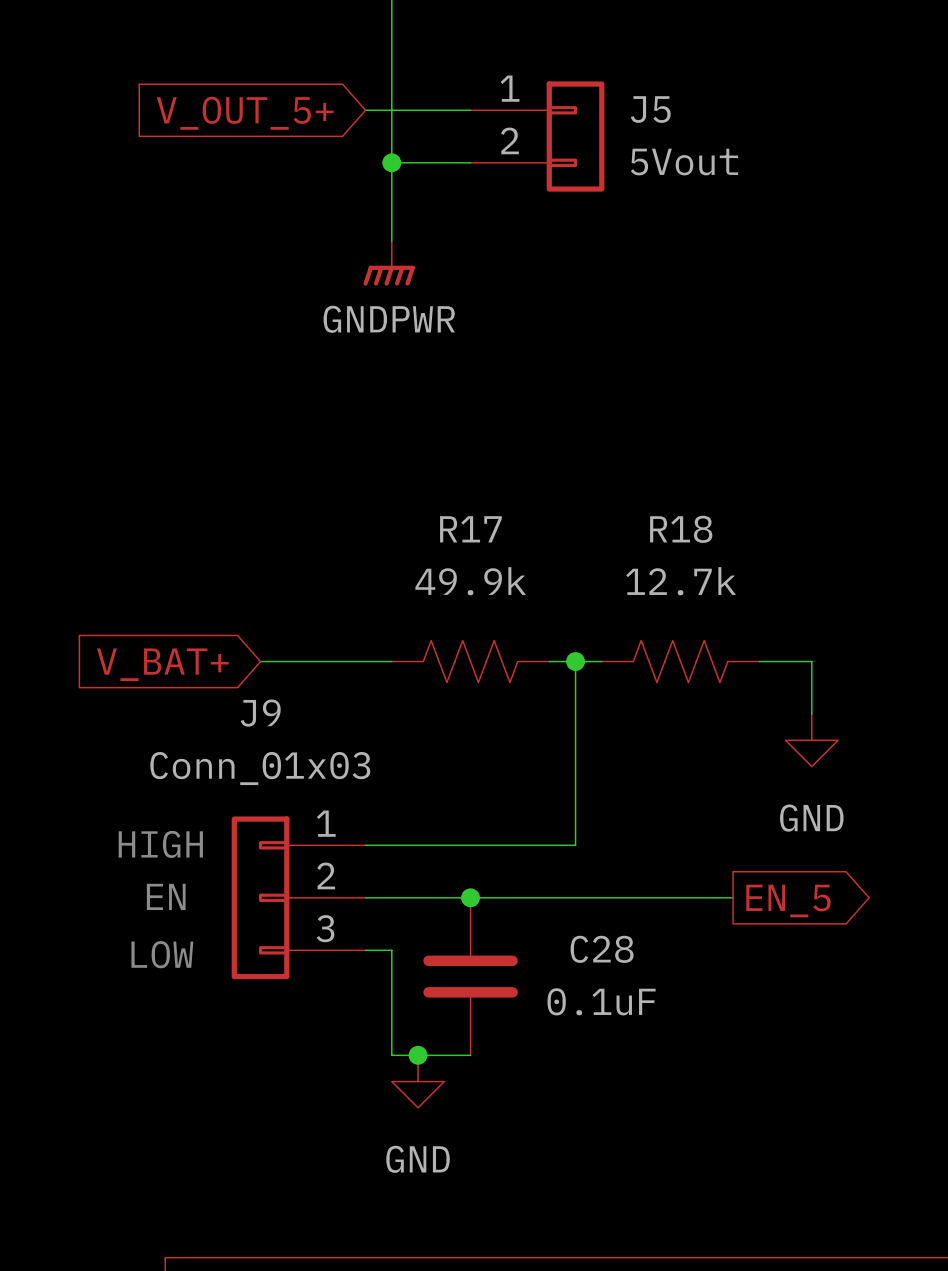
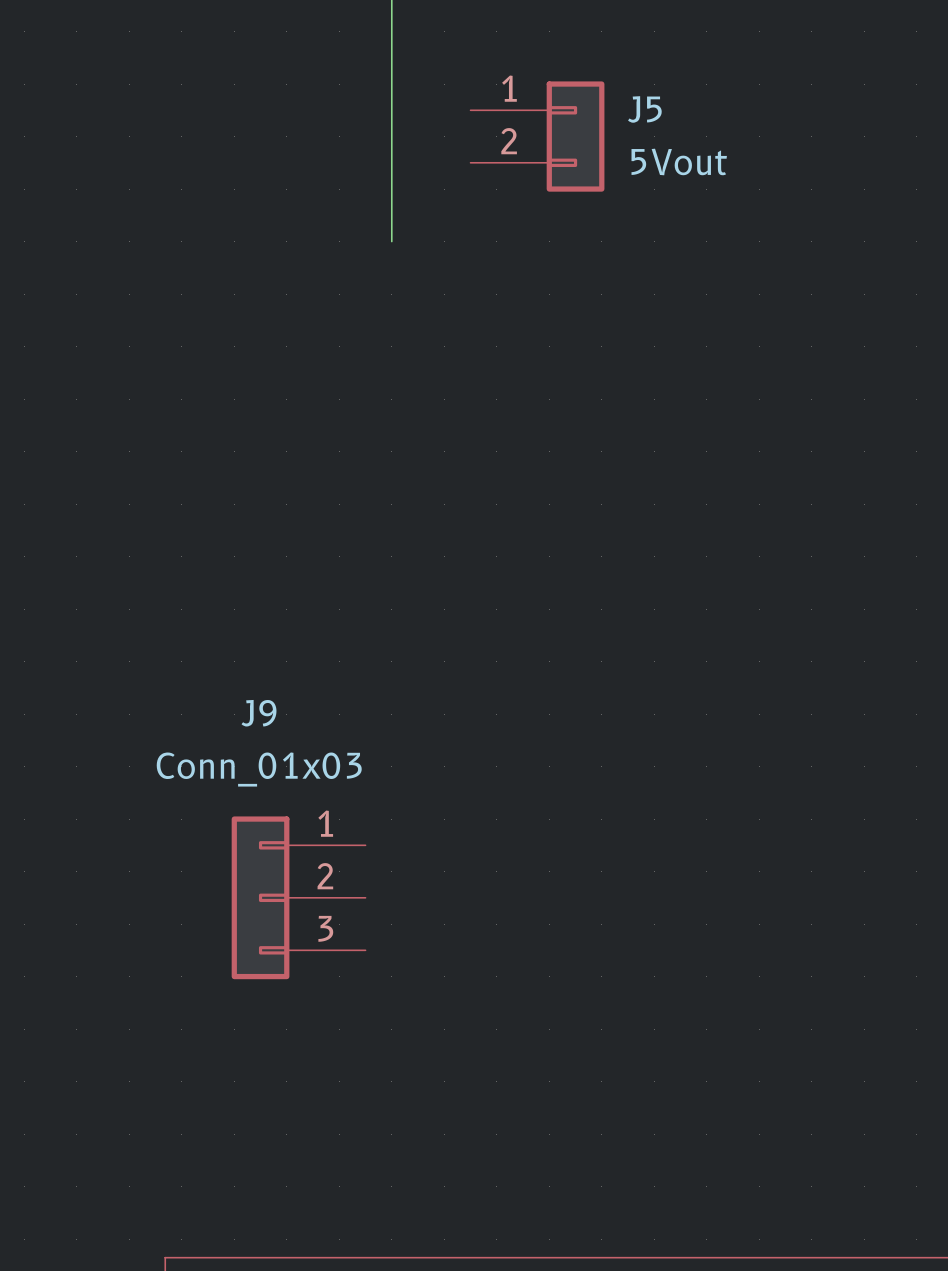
wire: (365, 110) (470, 110) -> none
global label: V_OUT_5+ (245, 113) -> none
wire: (391, 162) (470, 162) -> none
junction: (391, 162) -> none
power symbol: GNDPWR (389, 263) -> none
wire: (260, 661) (391, 661) -> none
R17: 49.9k (470, 661) -> none
wire: (549, 661) (601, 661) -> none
wire: (575, 661) (575, 845) (365, 845) -> none
junction: (575, 661) -> none
R18: 12.7k (680, 661) -> none
wire: (759, 661) (811, 661) (811, 714) -> none
global label: V_BAT+ (162, 664) -> none
power symbol: GND (811, 740) -> none
text: HIGH (160, 844) -> none
text: EN (166, 896) -> none
wire: (365, 897) (733, 897) -> none
junction: (470, 897) -> none
global label: EN_5 (788, 900) -> none
wire: (365, 950) (391, 950) (391, 1055) (470, 1055) -> none
text: LOW (162, 954) -> none
C28: 0.1uF (470, 976) -> none
junction: (418, 1055) -> none
power symbol: GND (418, 1081) -> none

